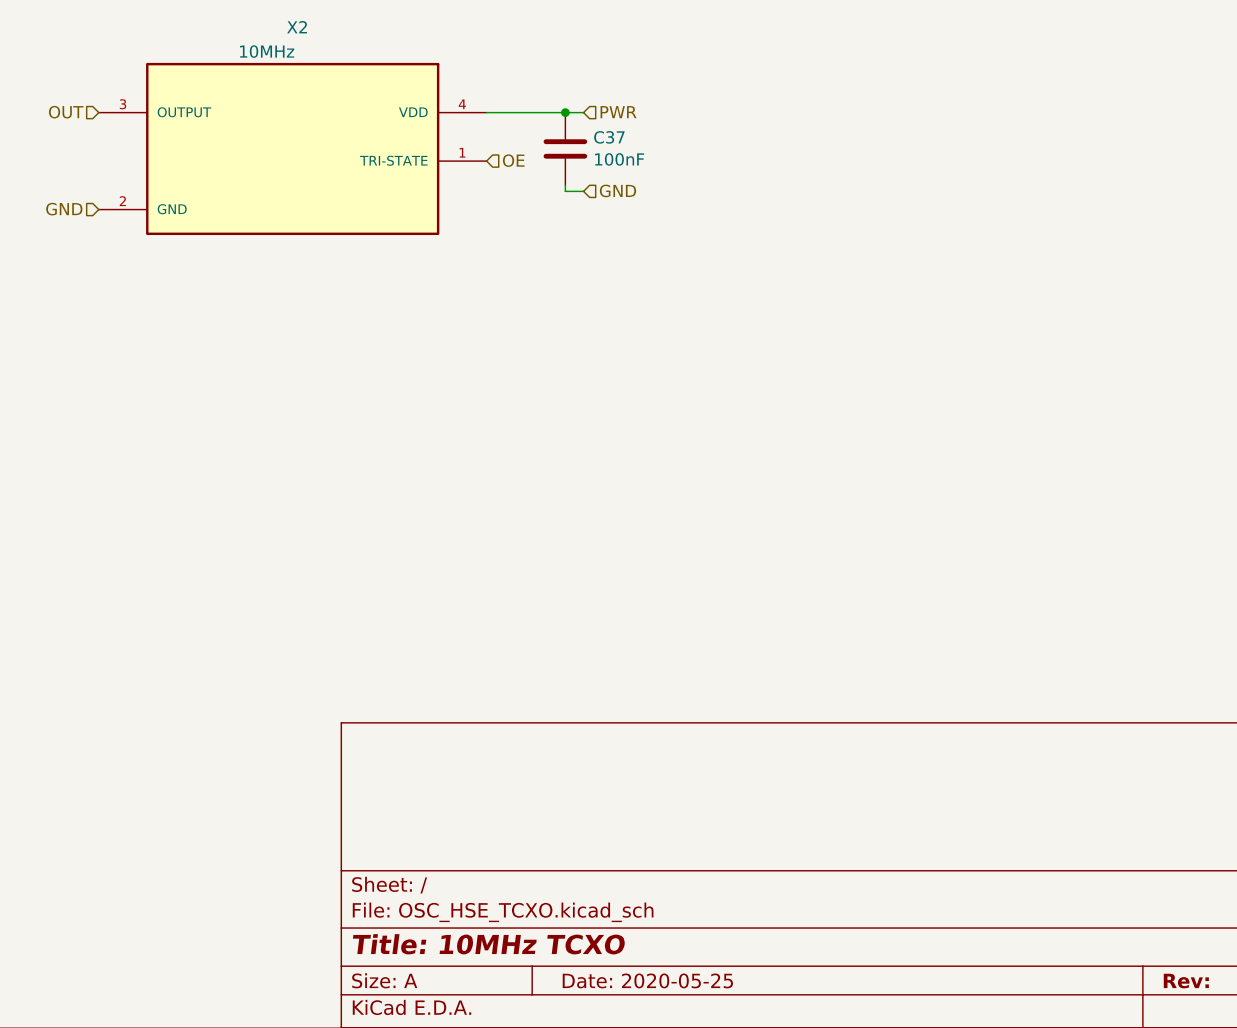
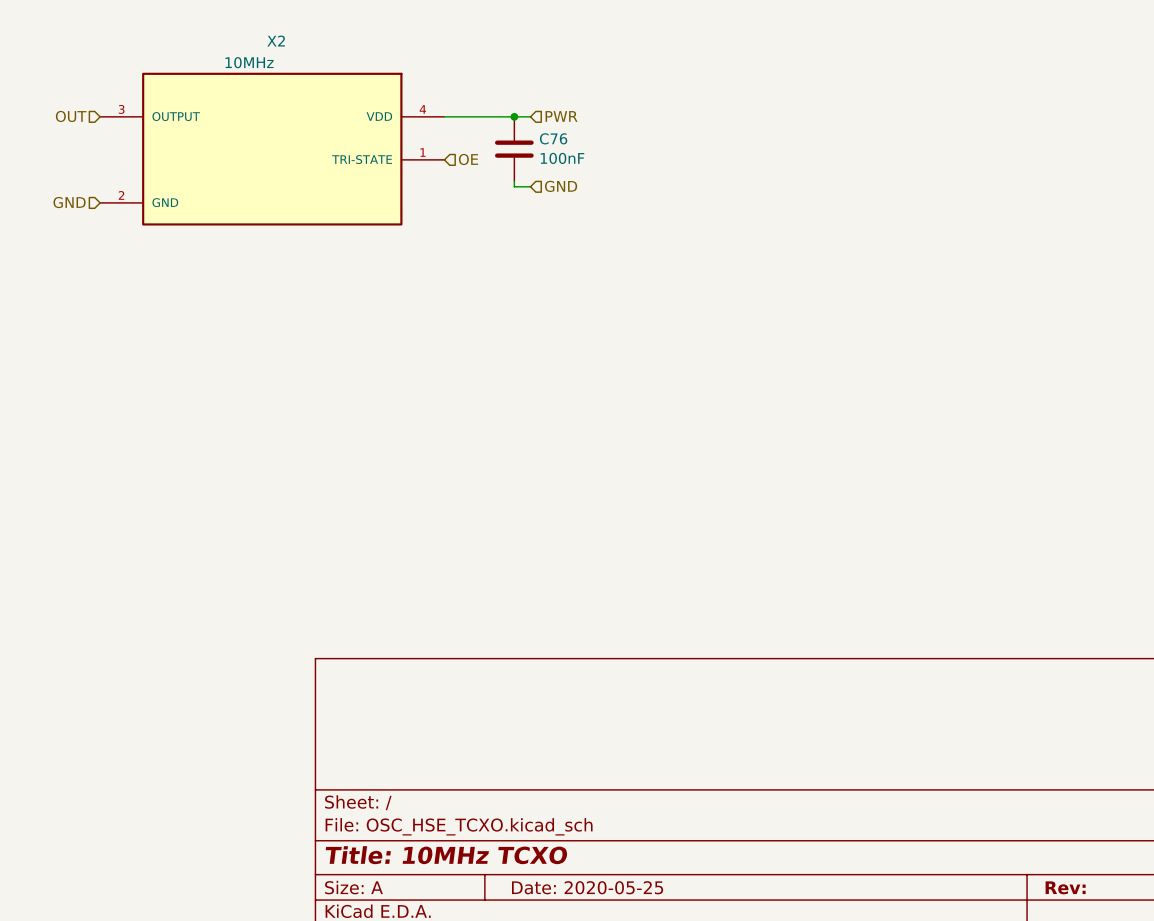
C37 name: C37 (609, 137) -> C76 (553, 138)

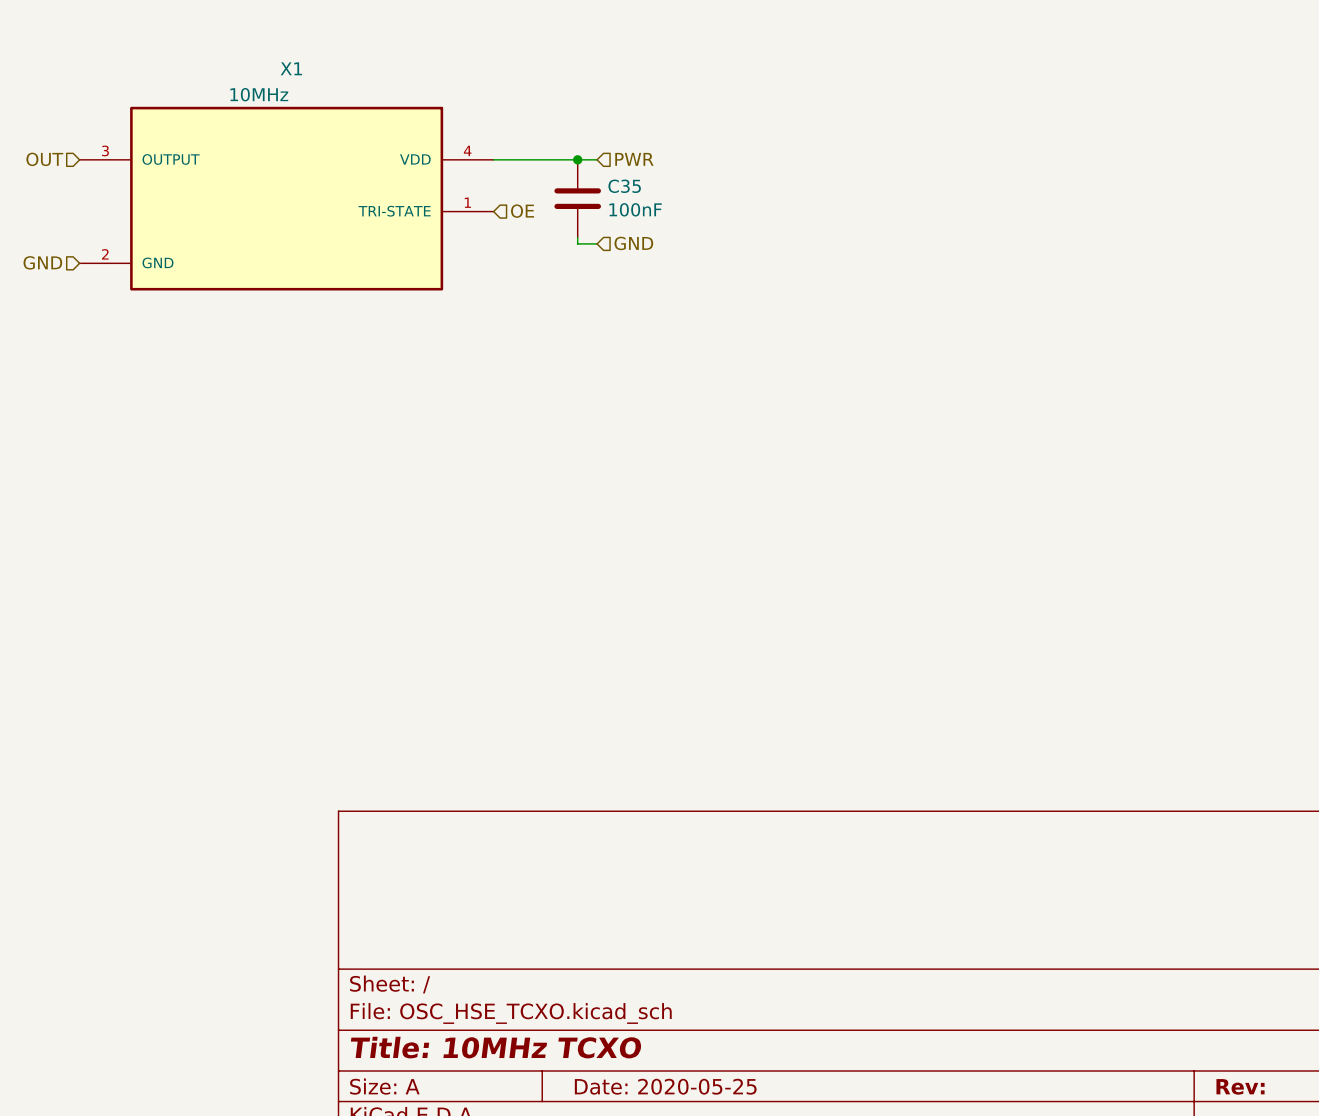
X2 name: X2 (276, 41) -> X1 (291, 68)
C76 name: C76 (553, 138) -> C35 (624, 186)

